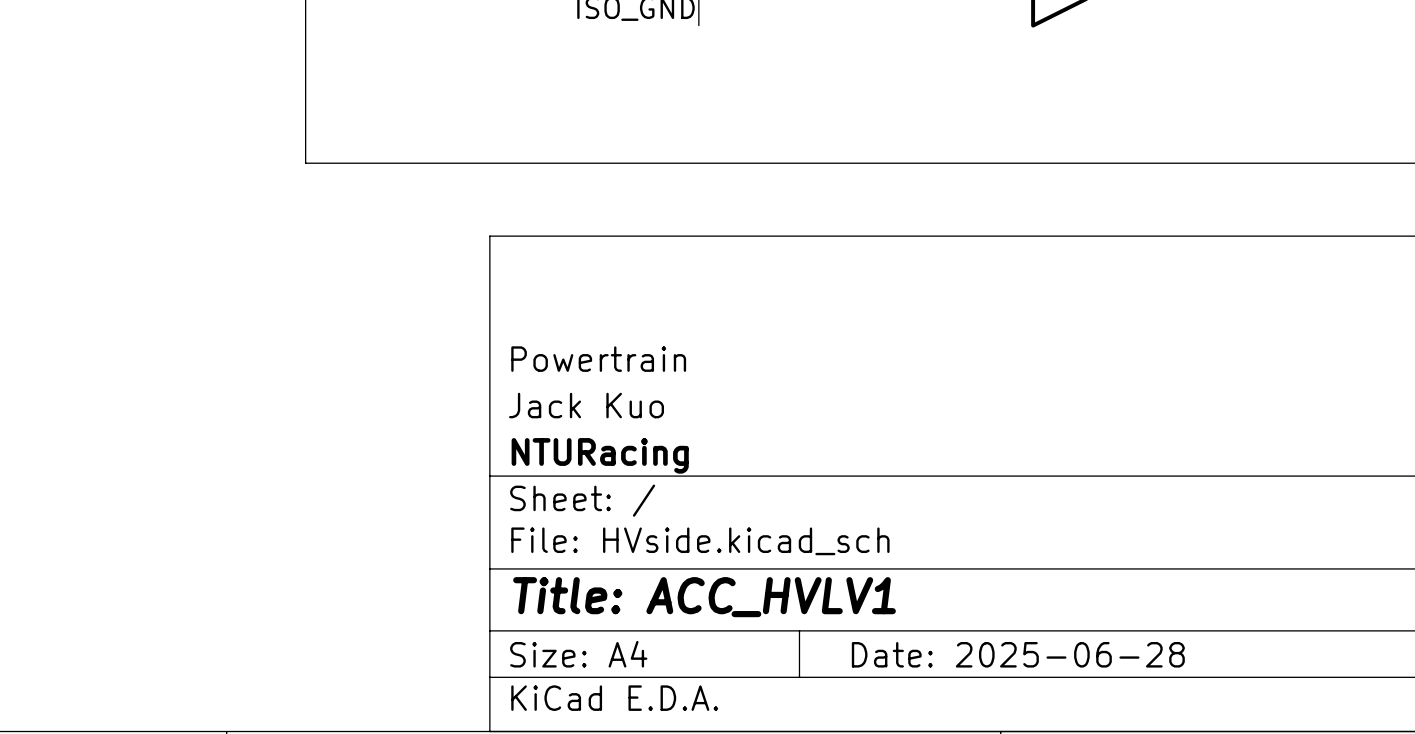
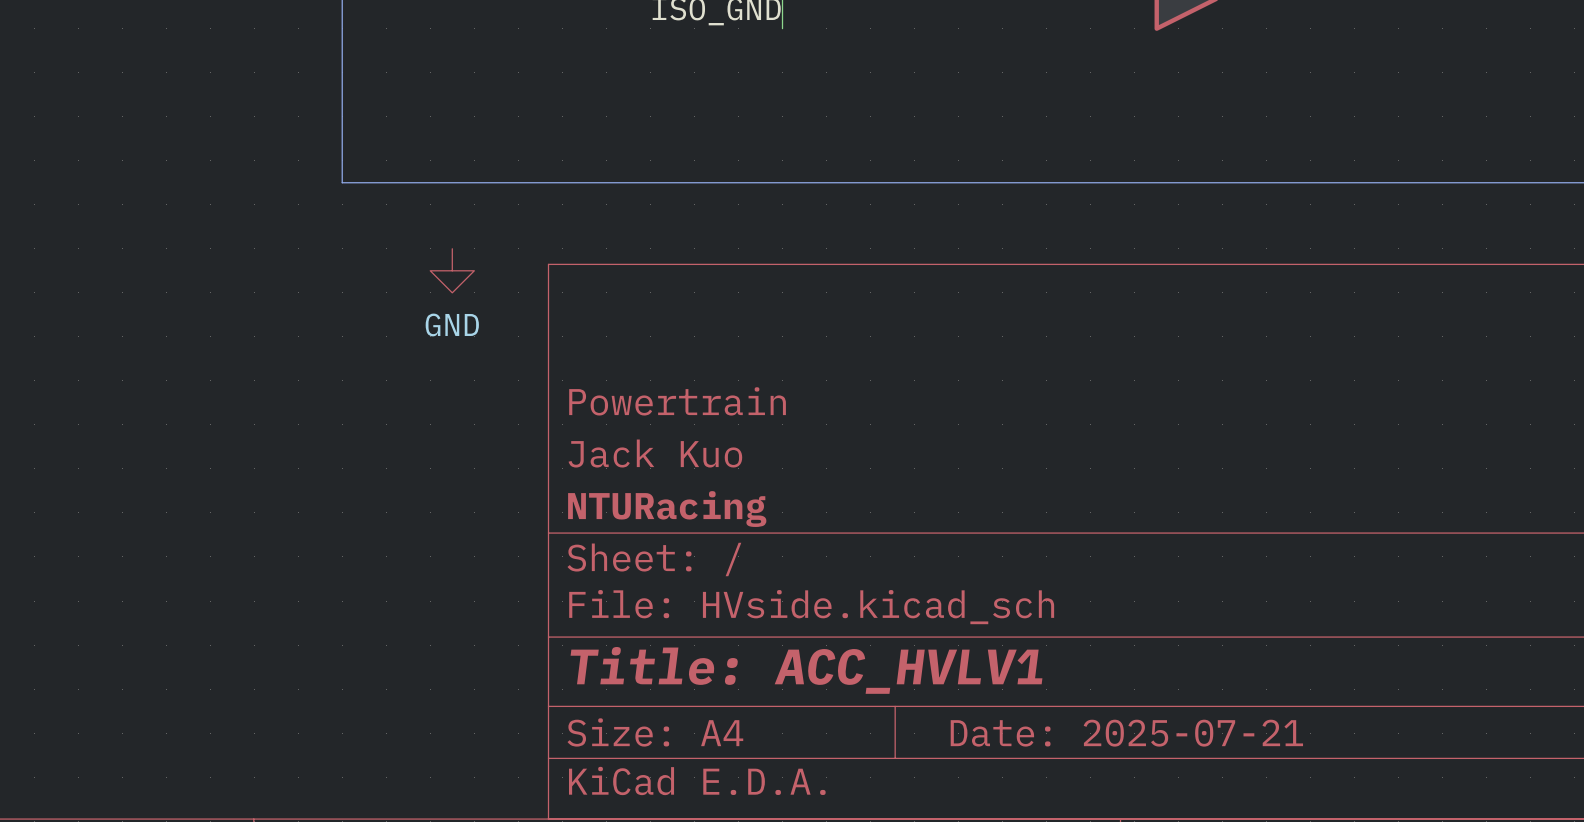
power symbol: none -> GND (452, 270)
title block: Date: 2025-06-28 (1018, 654) -> Date: 2025-07-21 (1126, 733)

